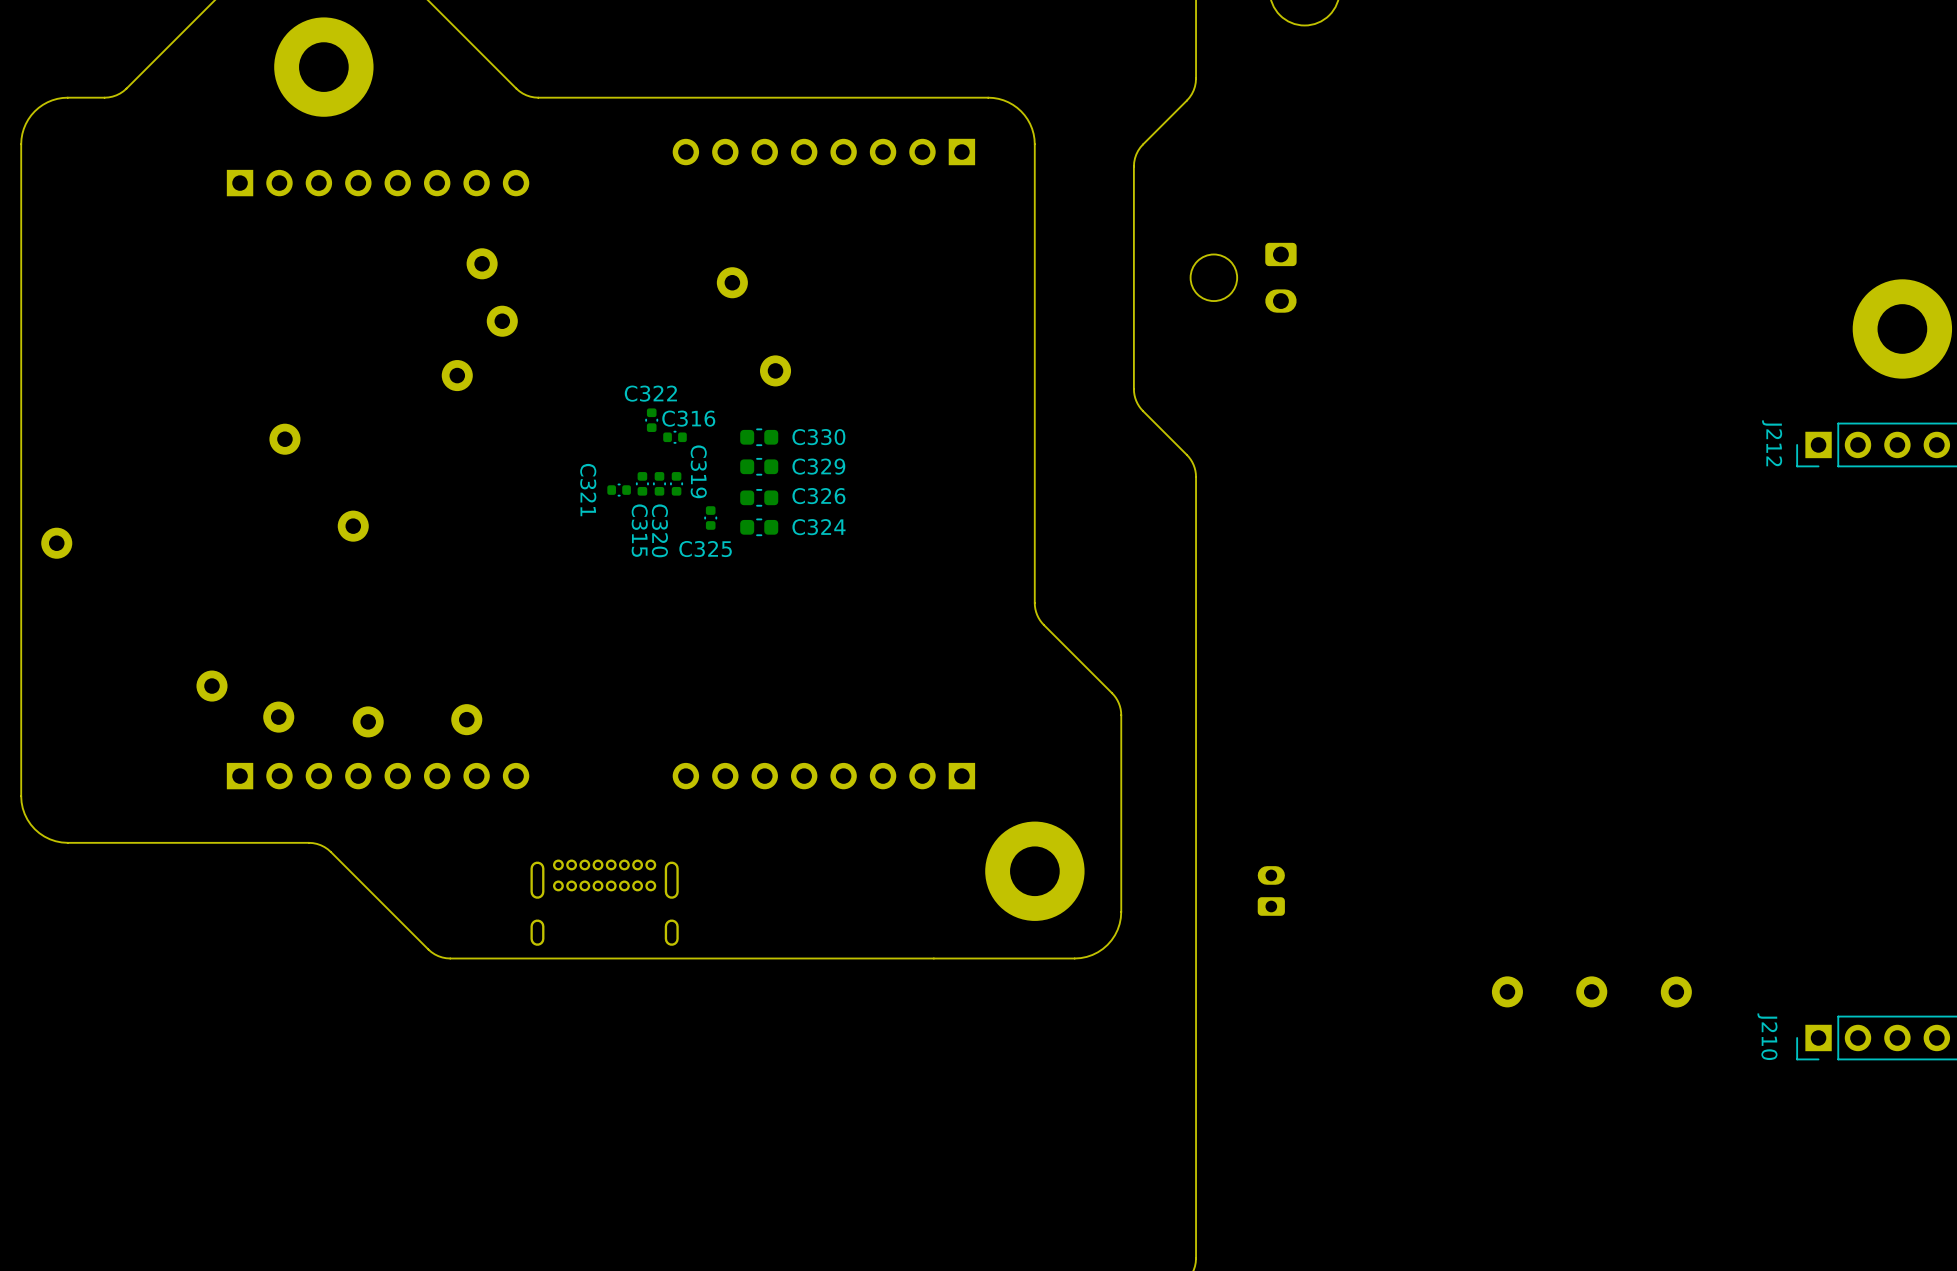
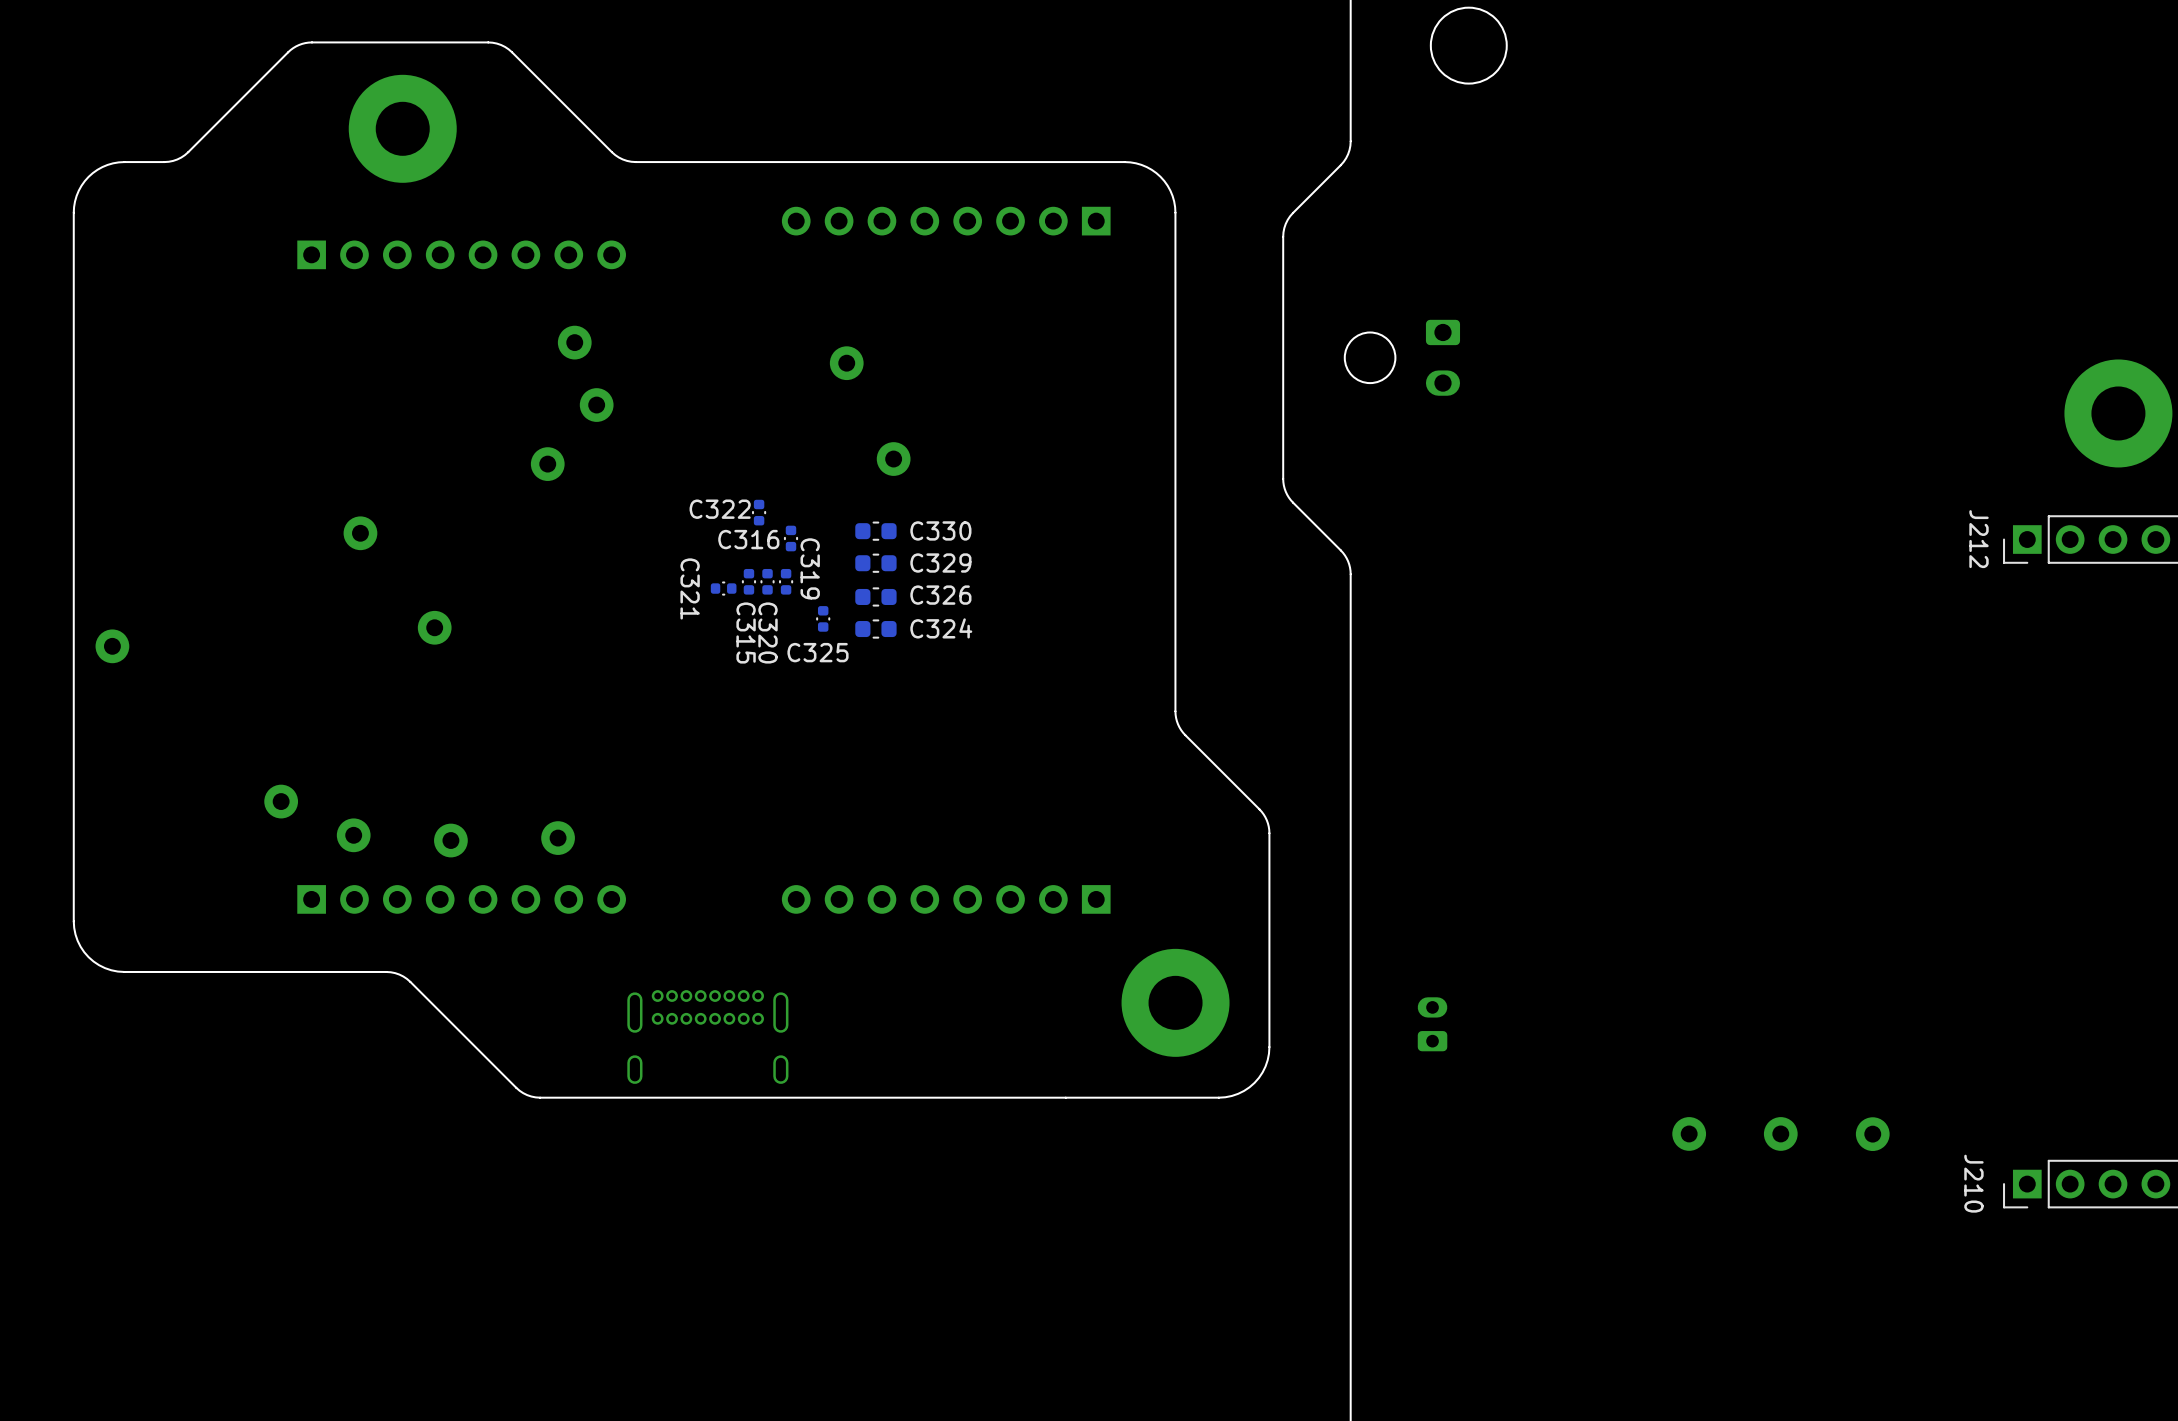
C322 name position: C322 (650, 393) -> C322 (720, 509)
C316 name position: C316 (688, 418) -> C316 (748, 539)
C316 rotation: 0° (675, 437) -> 90° clockwise (791, 538)

